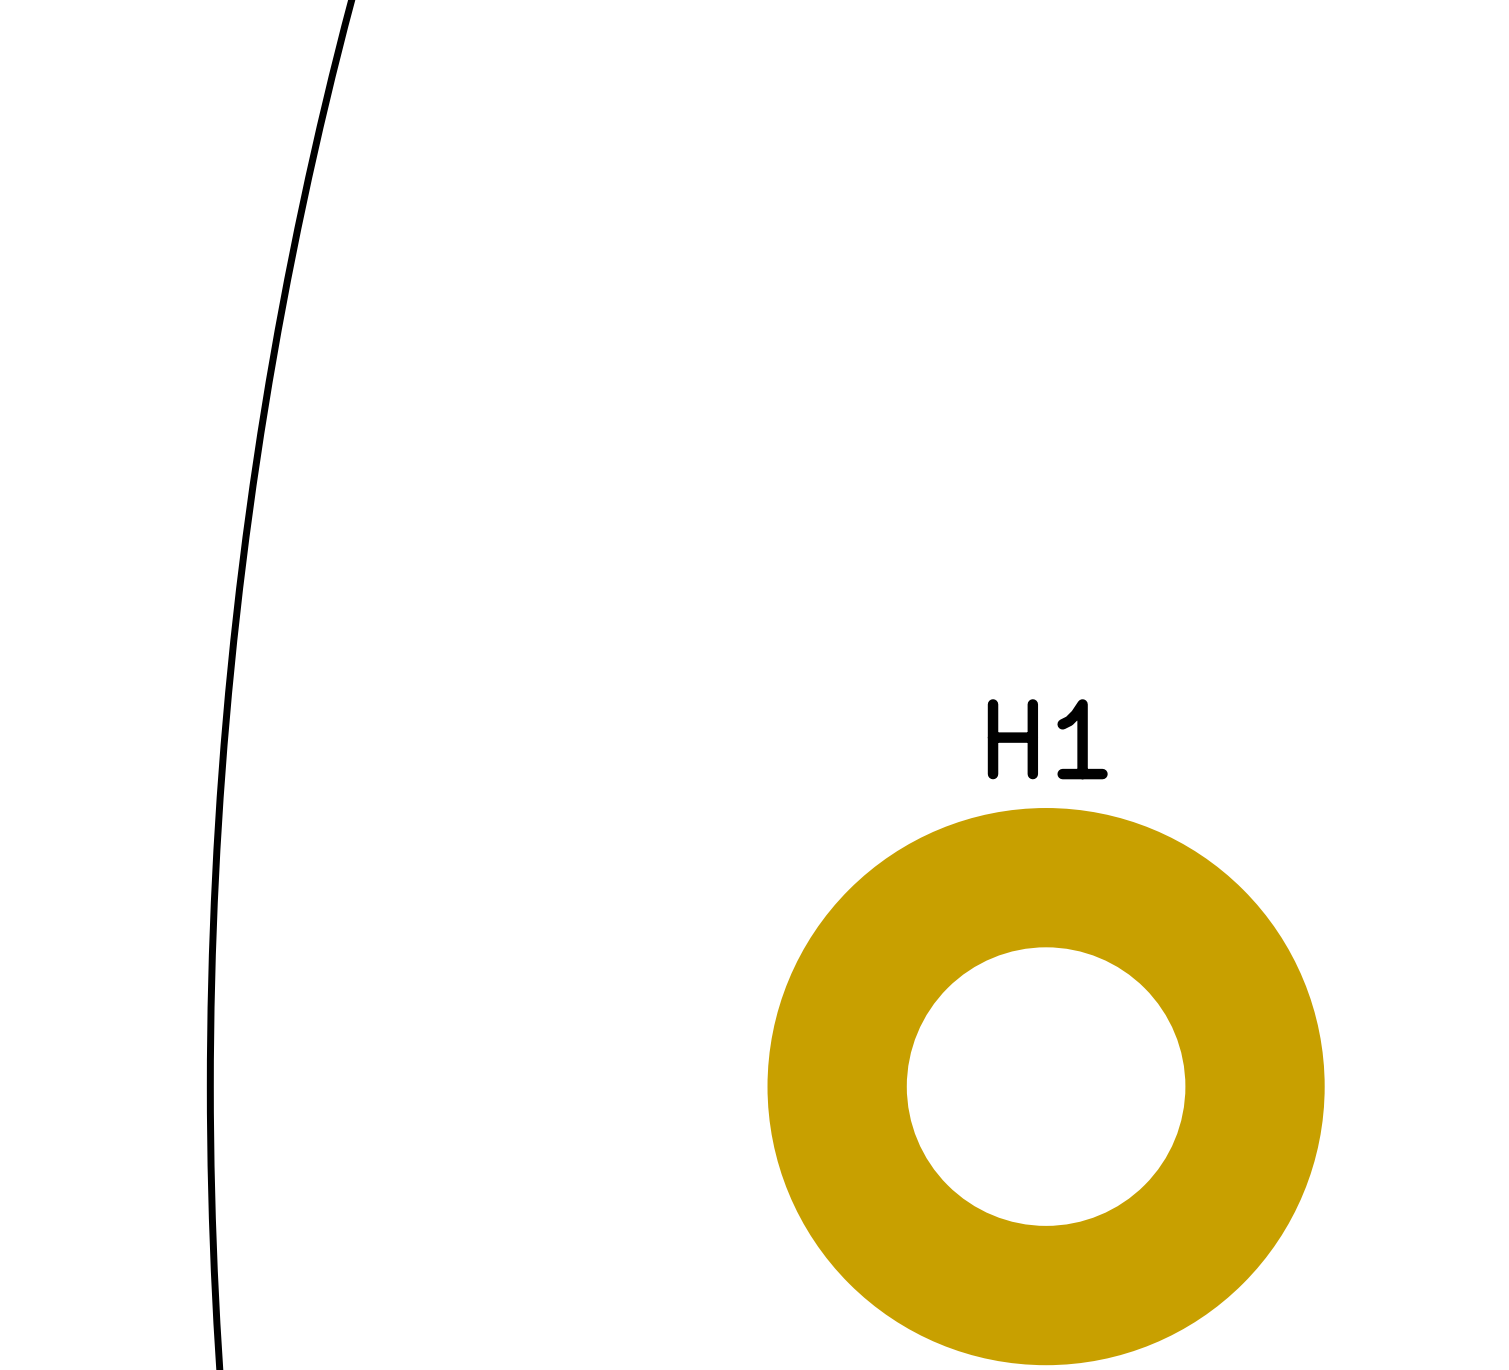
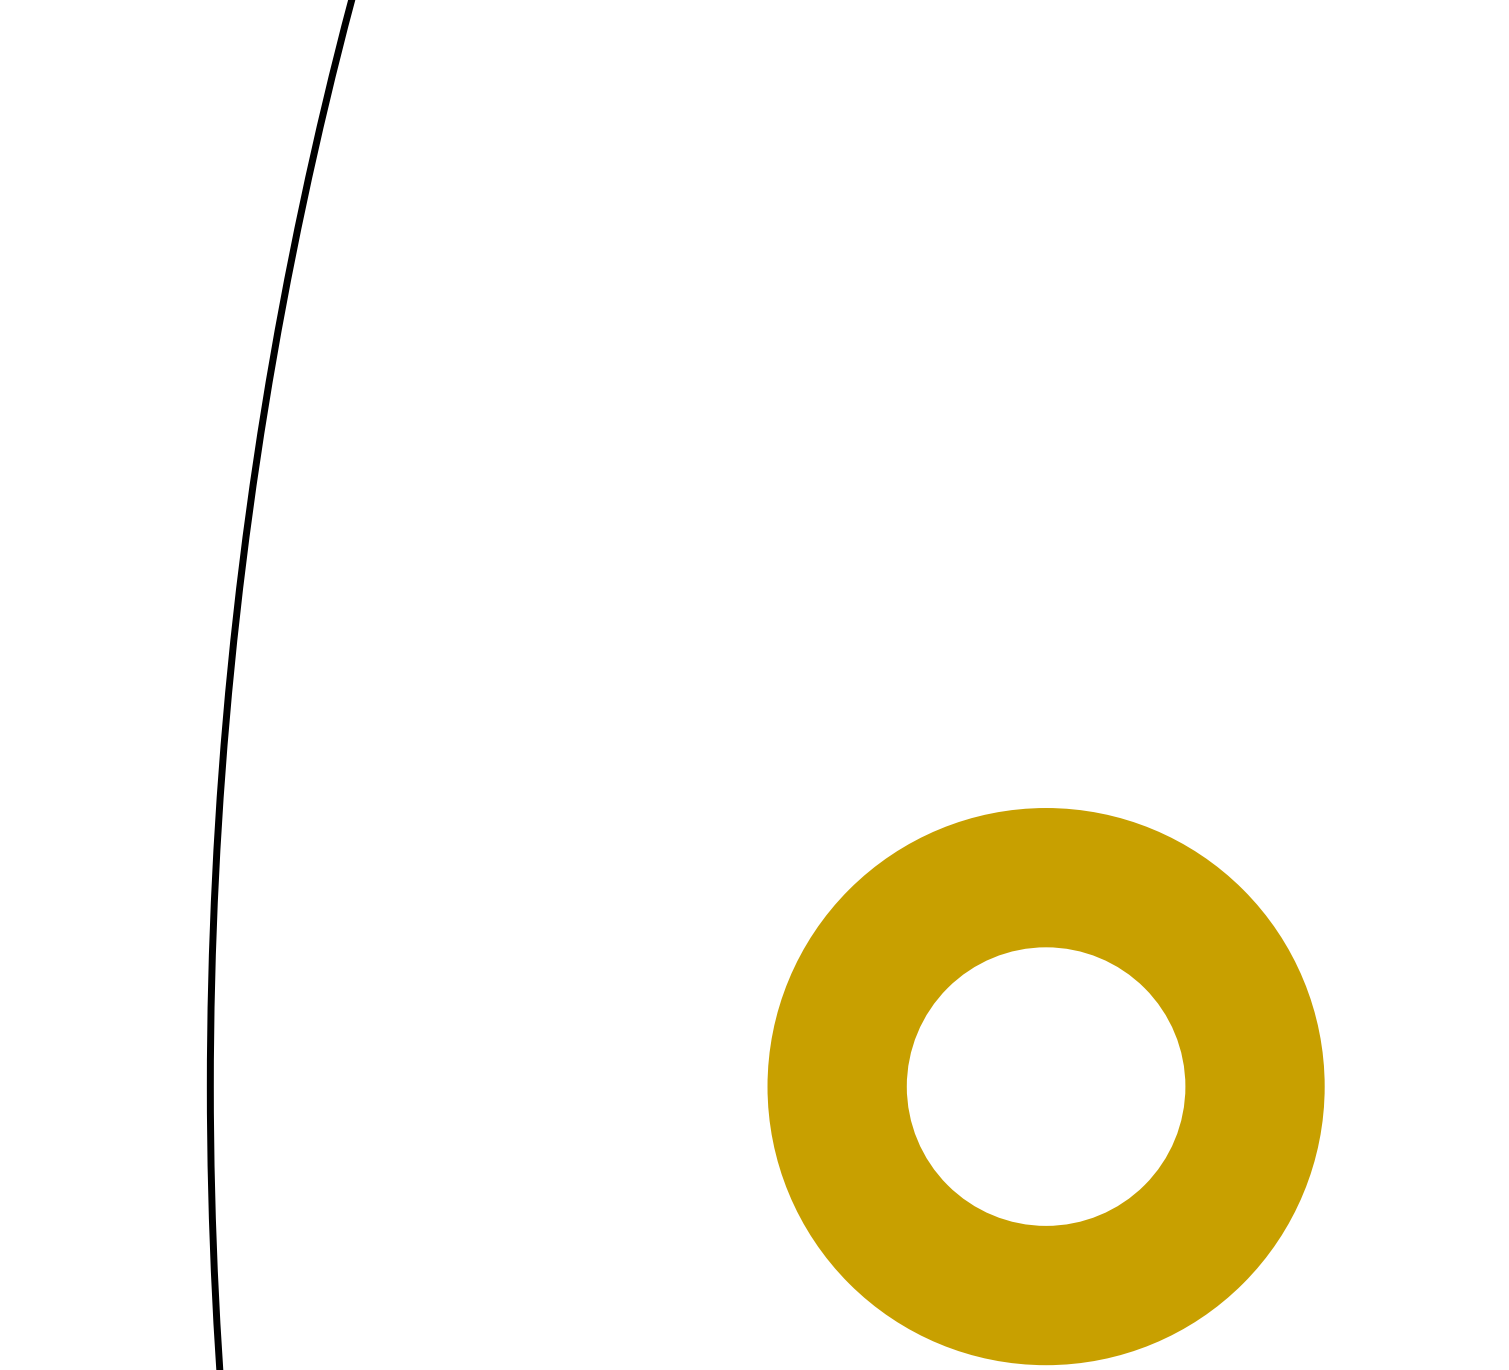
H1 name: H1 (1047, 739) -> none

